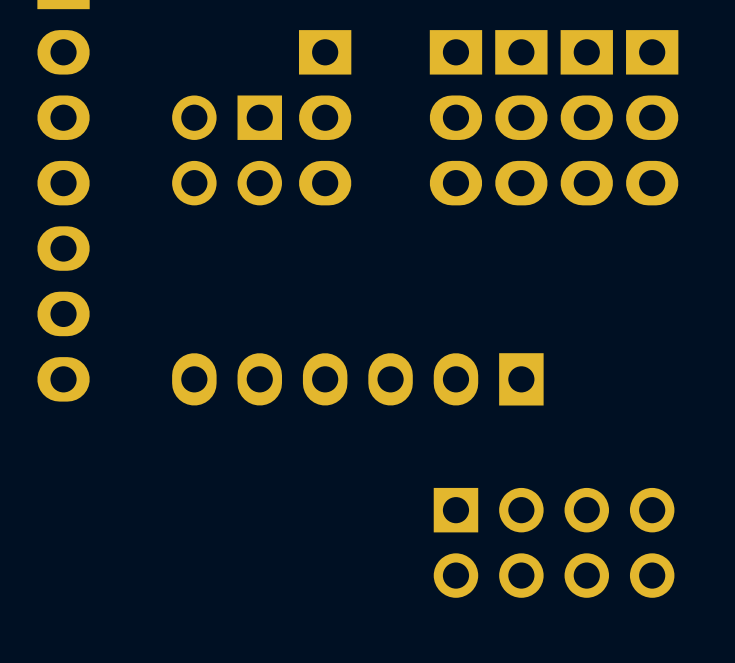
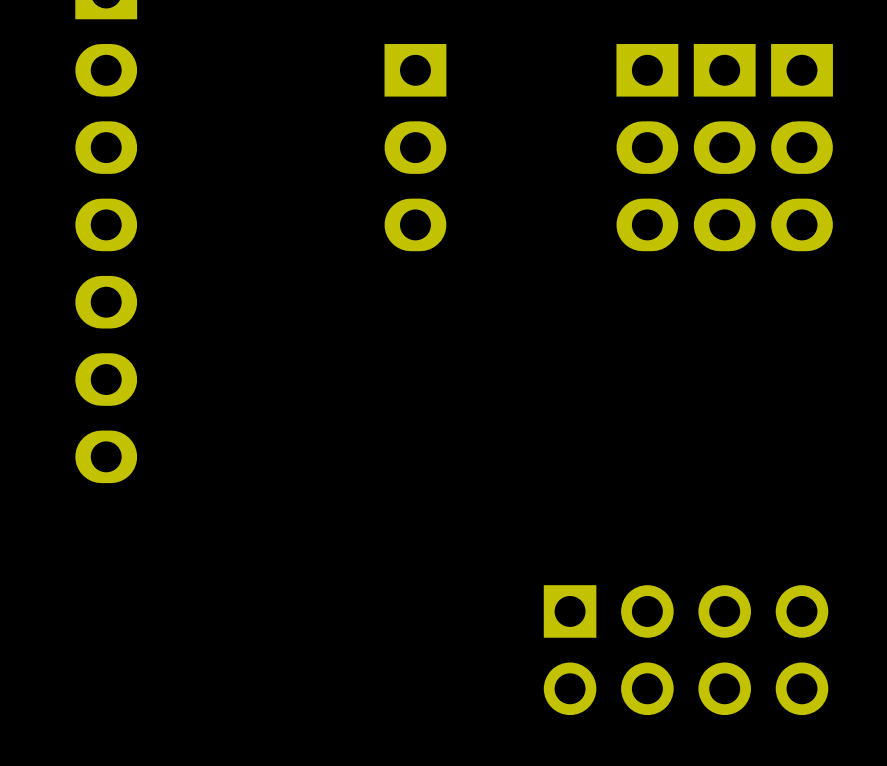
part: (455, 117) -> none
part: (227, 150) -> none
part: (357, 379) -> none

